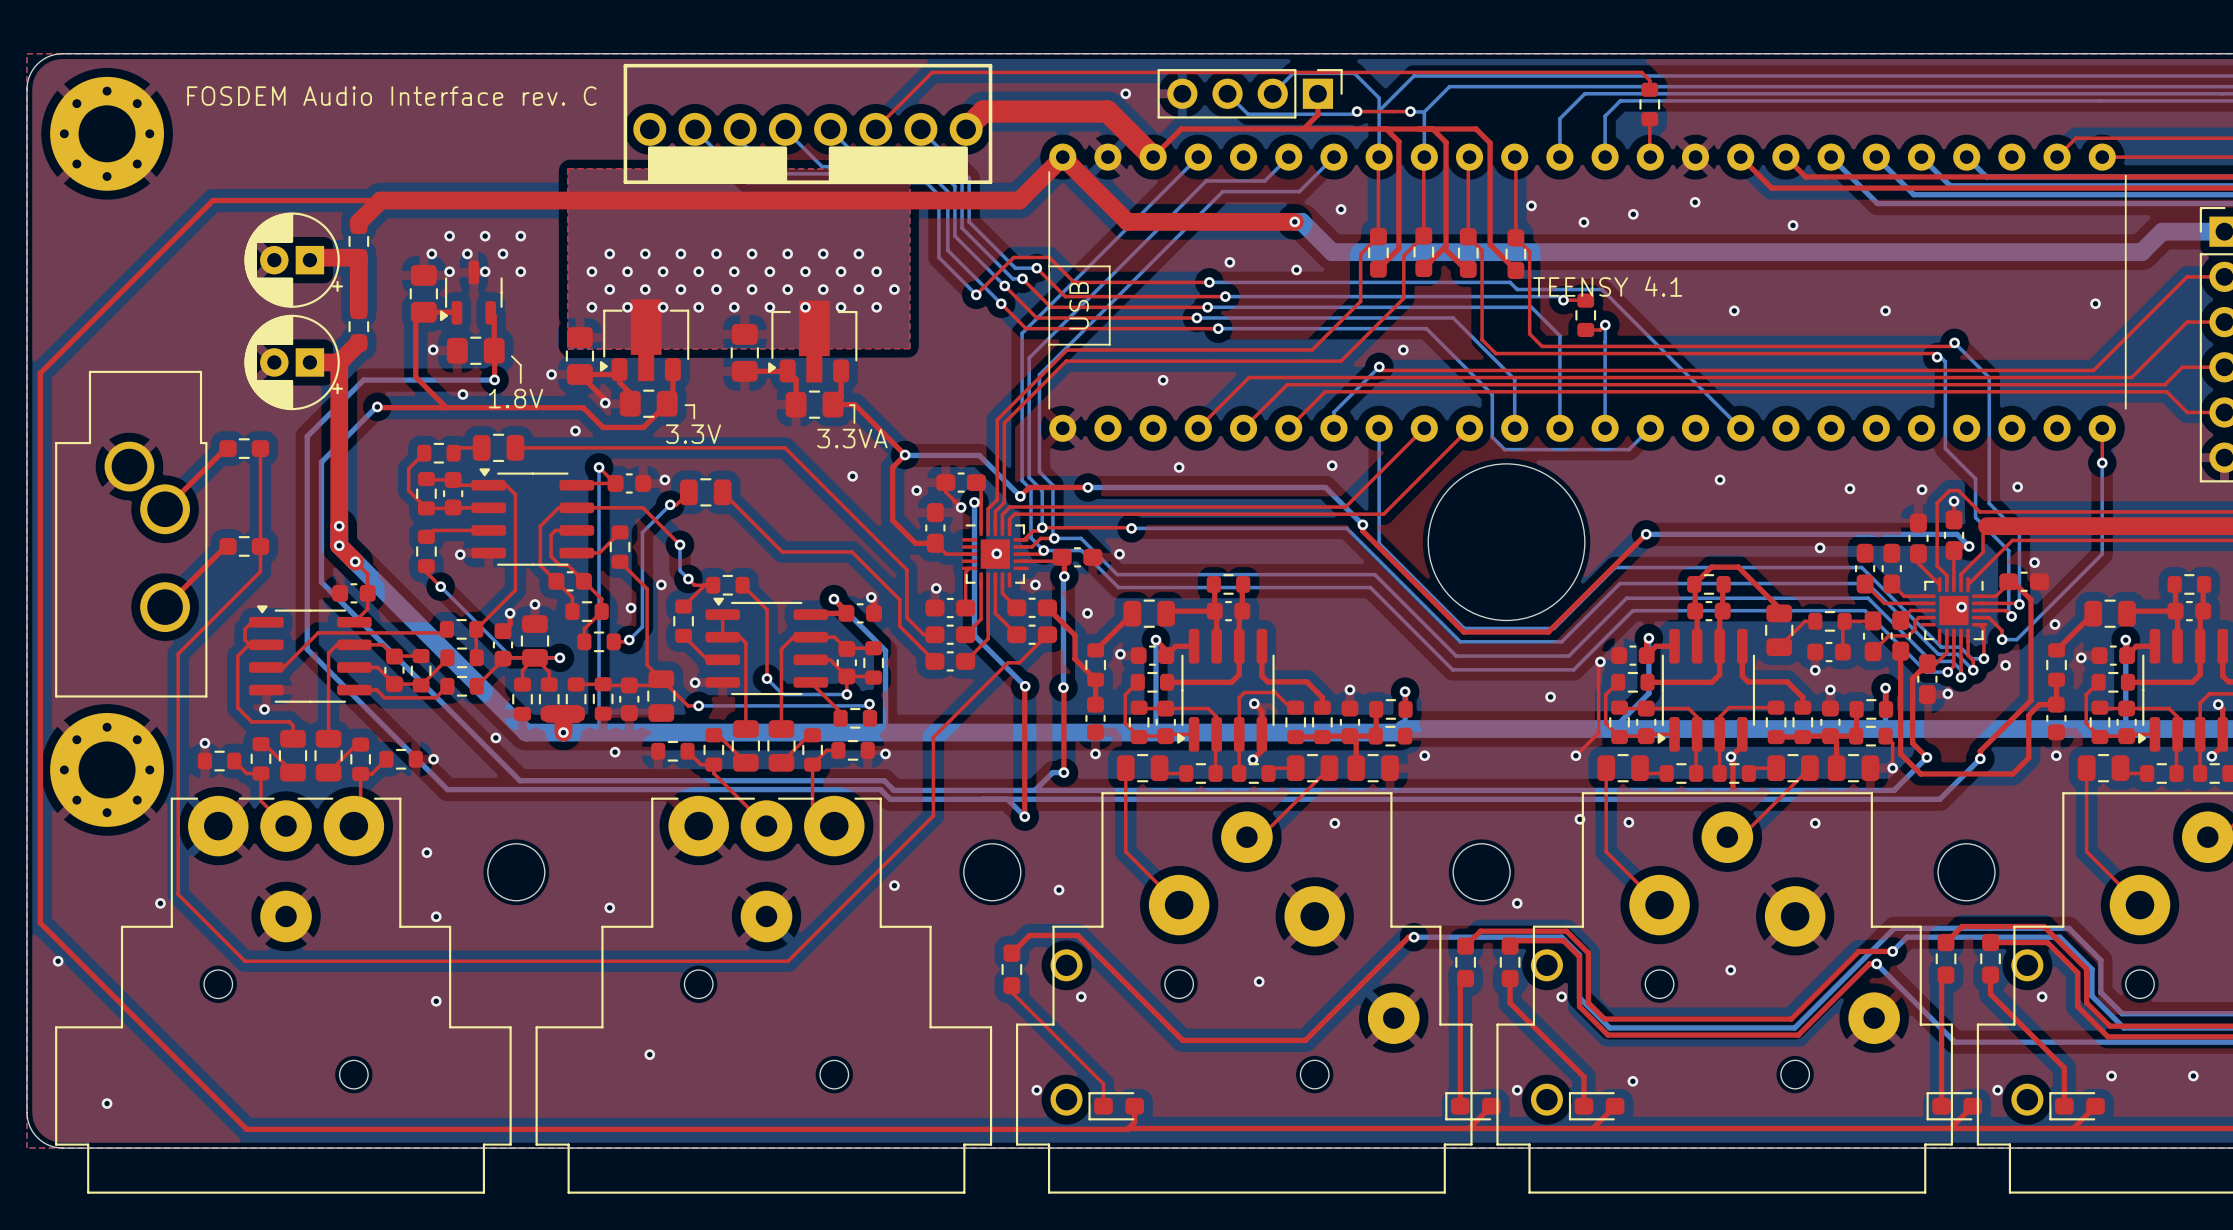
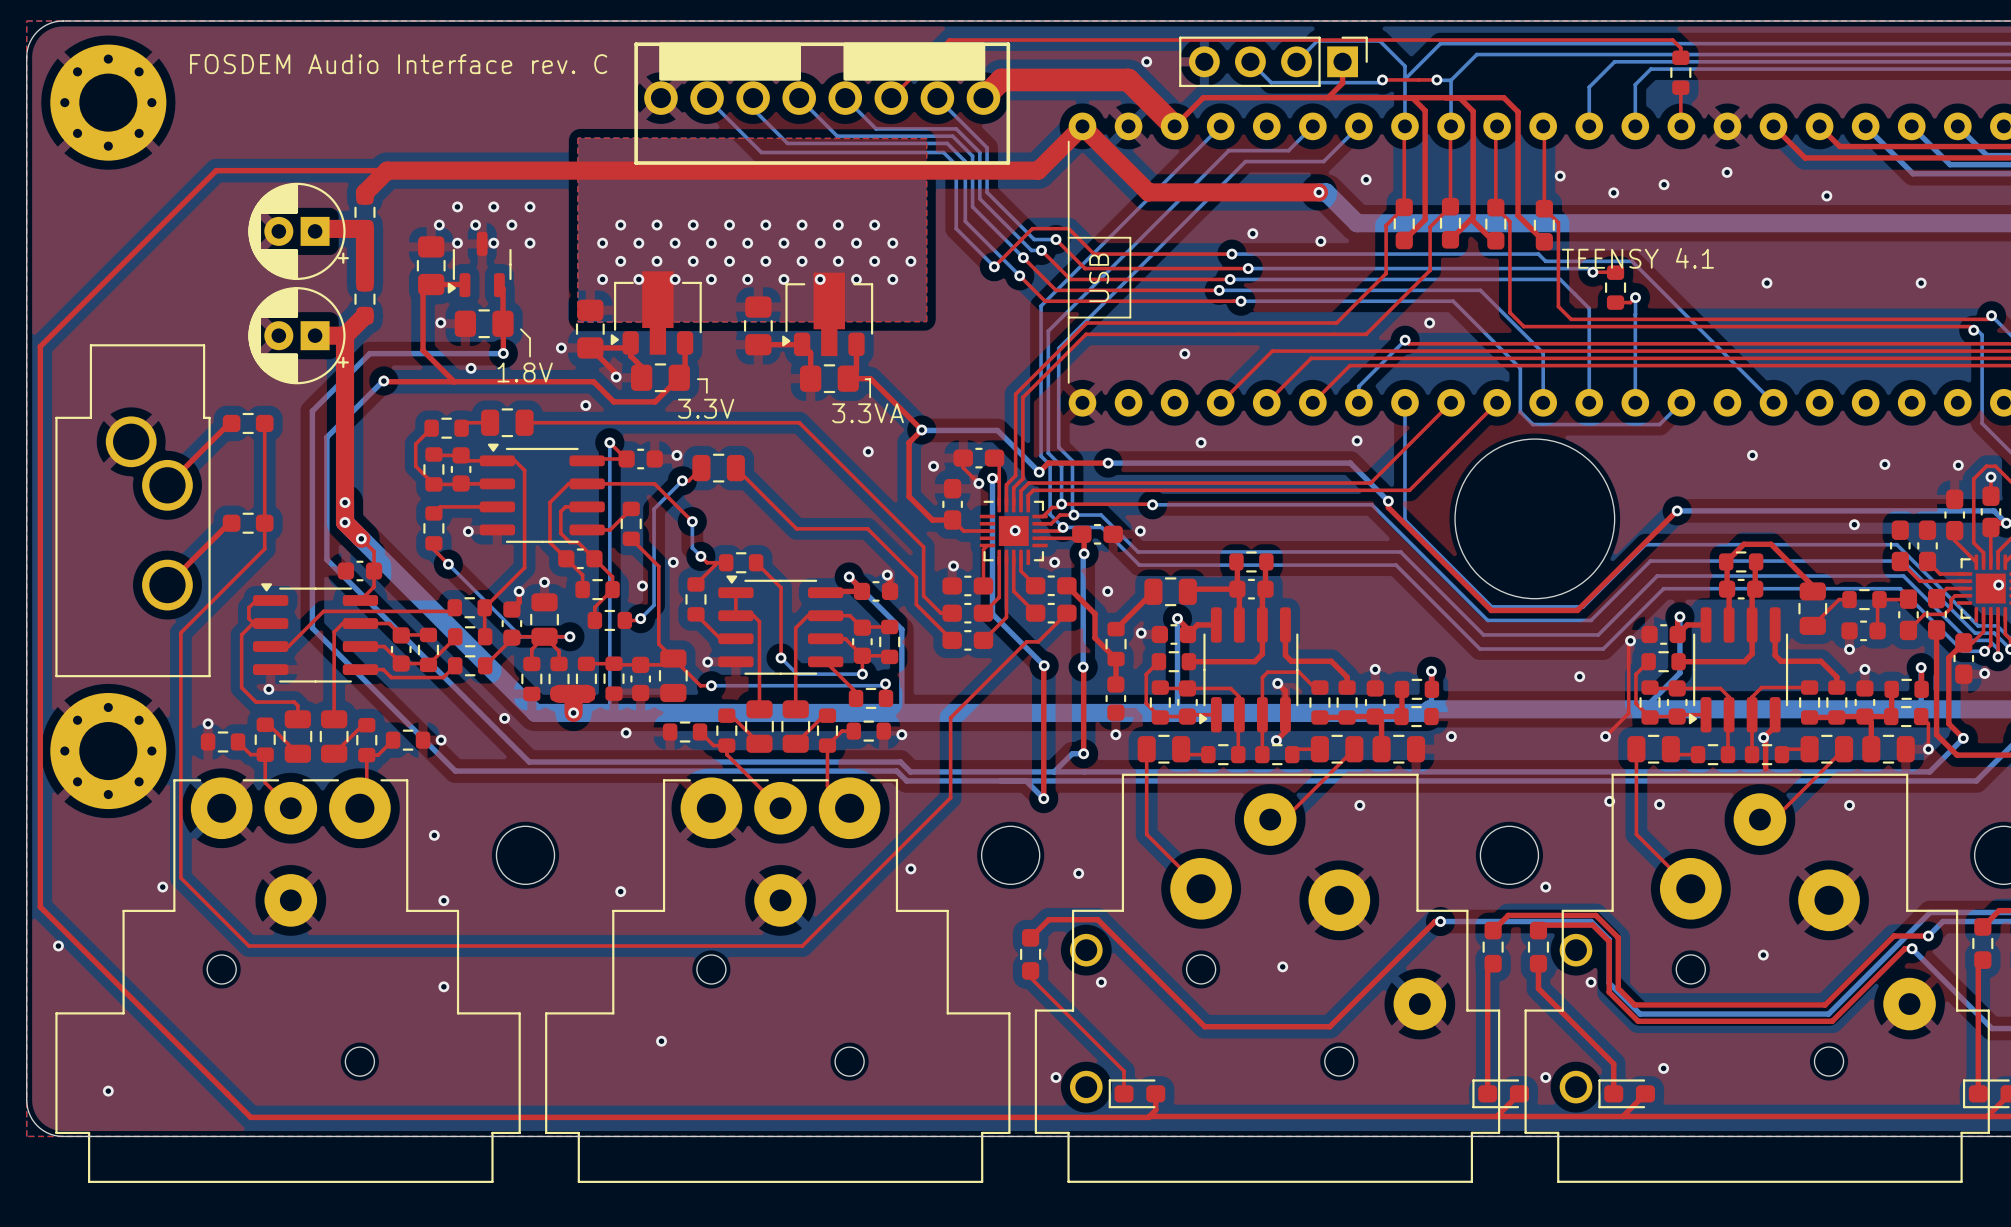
part rotation: 0° (807, 123) -> 180° (822, 103)

